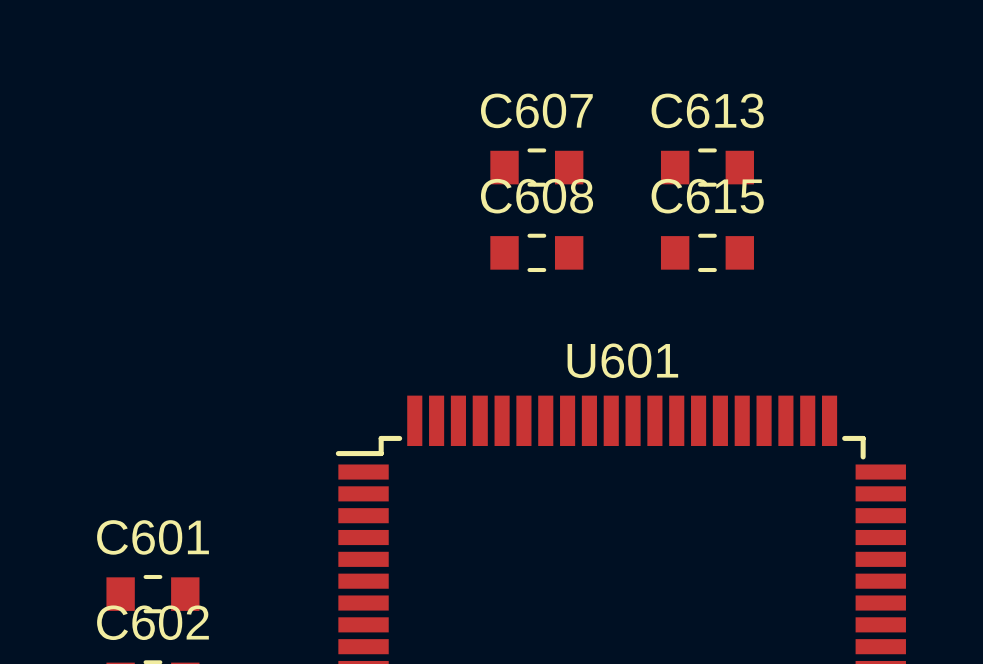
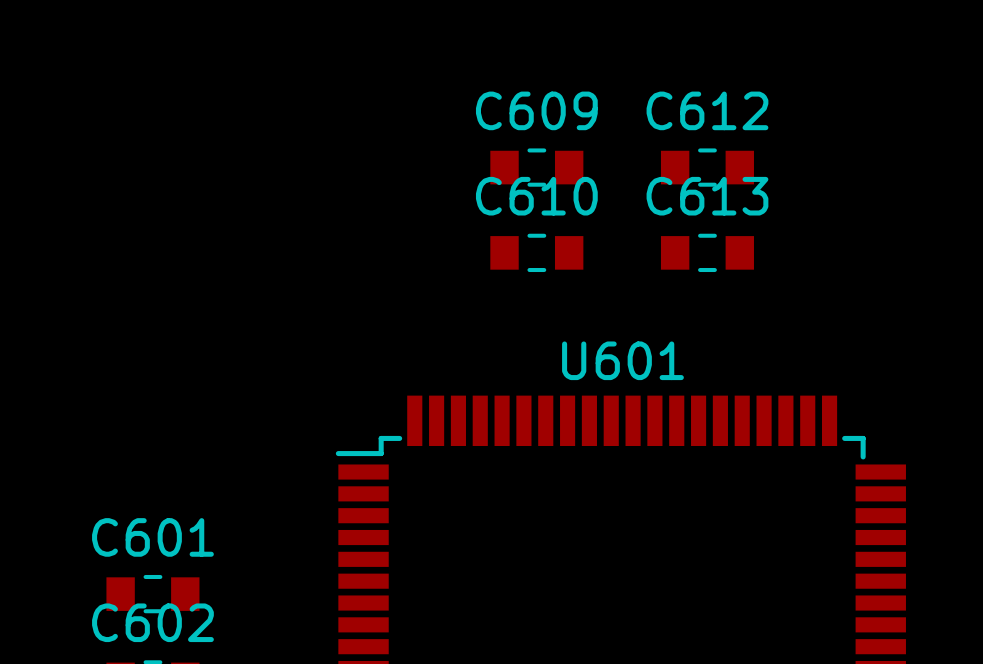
C607 name: C607 (536, 110) -> C609 (536, 110)
C613 name: C613 (707, 110) -> C612 (707, 110)
C608 name: C608 (537, 196) -> C610 (536, 196)
C615 name: C615 (707, 196) -> C613 (707, 196)

